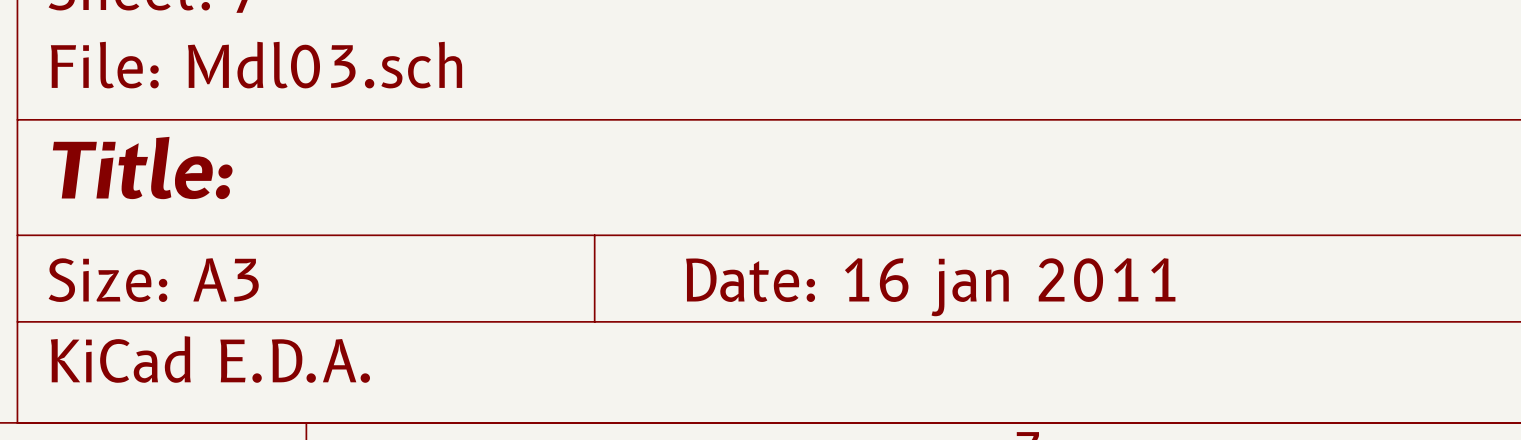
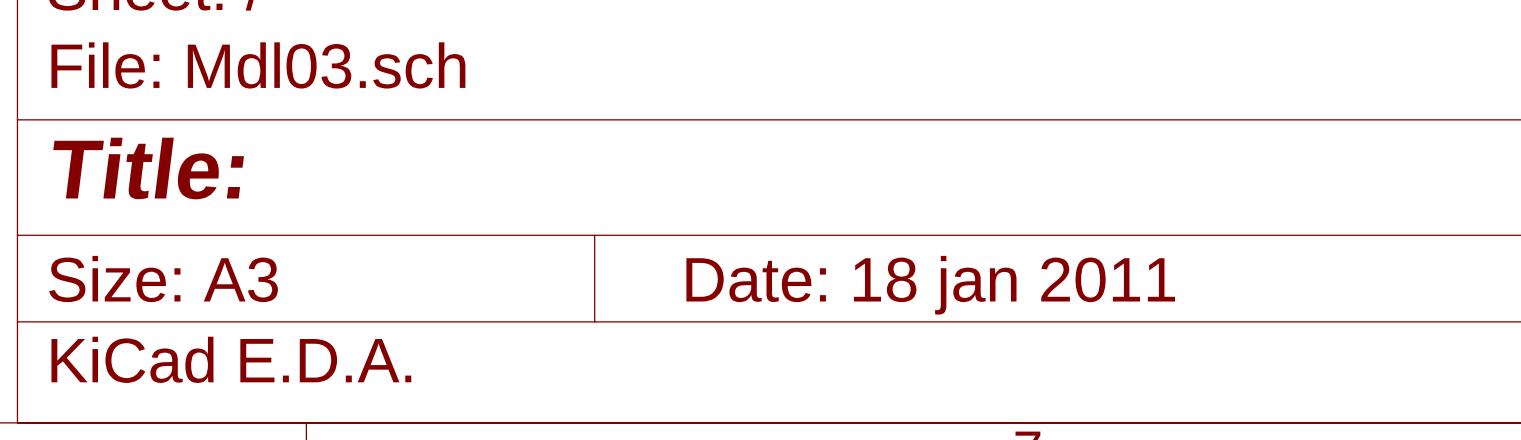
title block: Date: 16 jan 2011 (930, 287) -> Date: 18 jan 2011 (930, 285)

